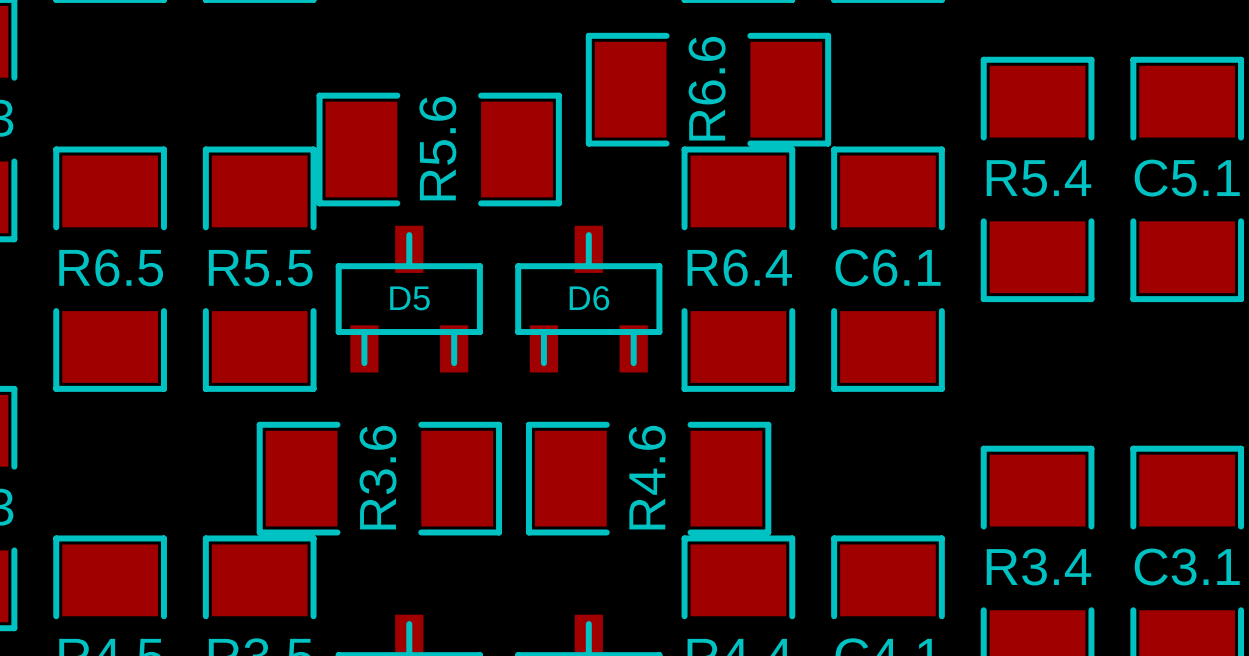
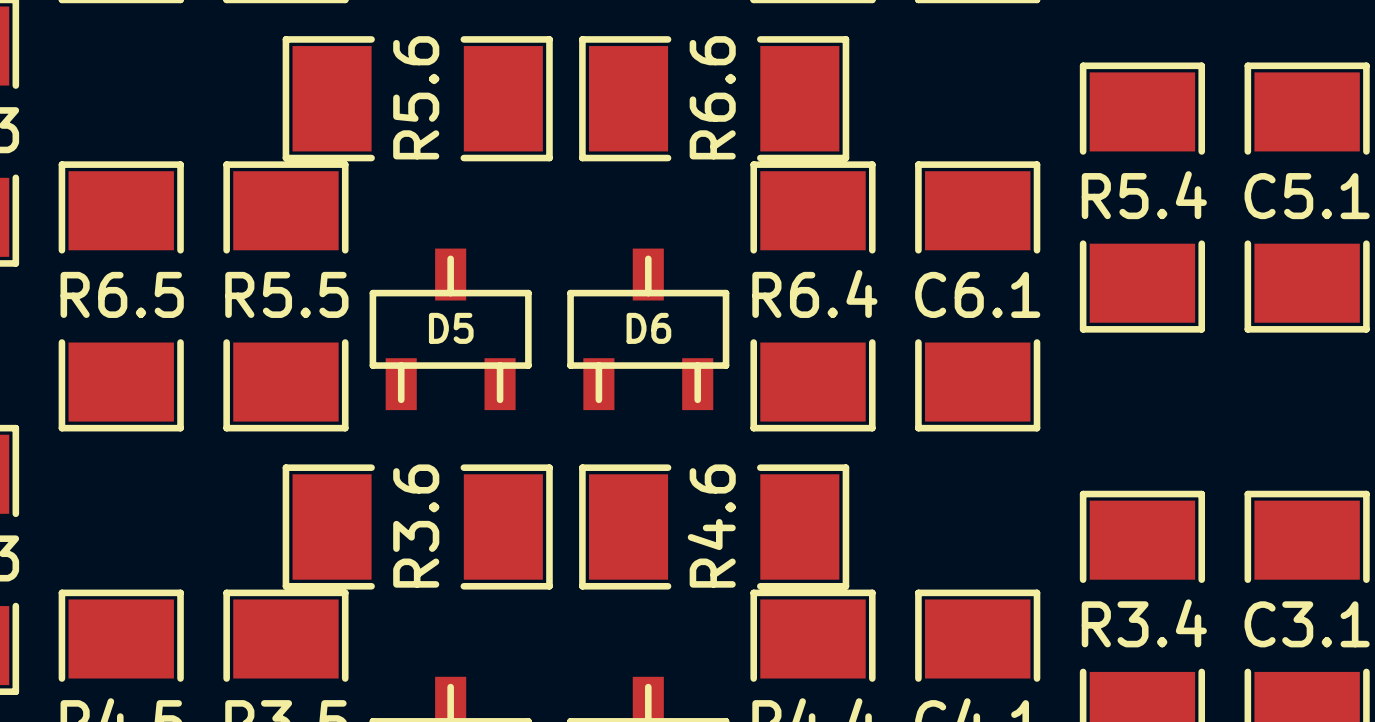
R6.6 position: (708, 89) -> (714, 98)
R5.6 position: (439, 149) -> (417, 98)

